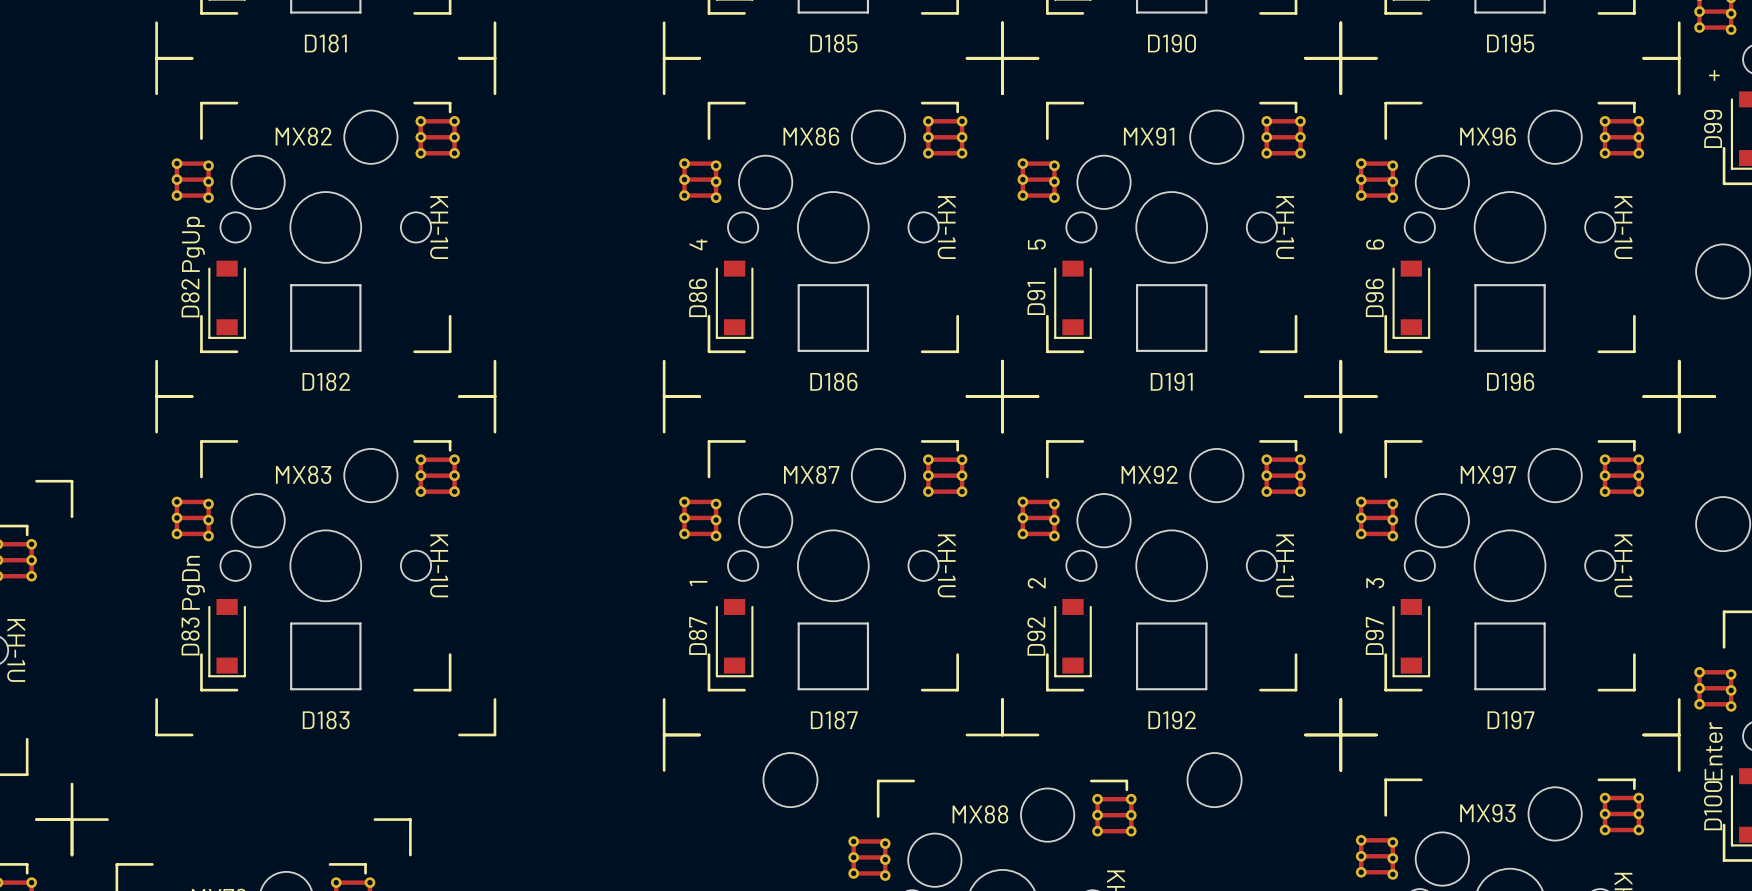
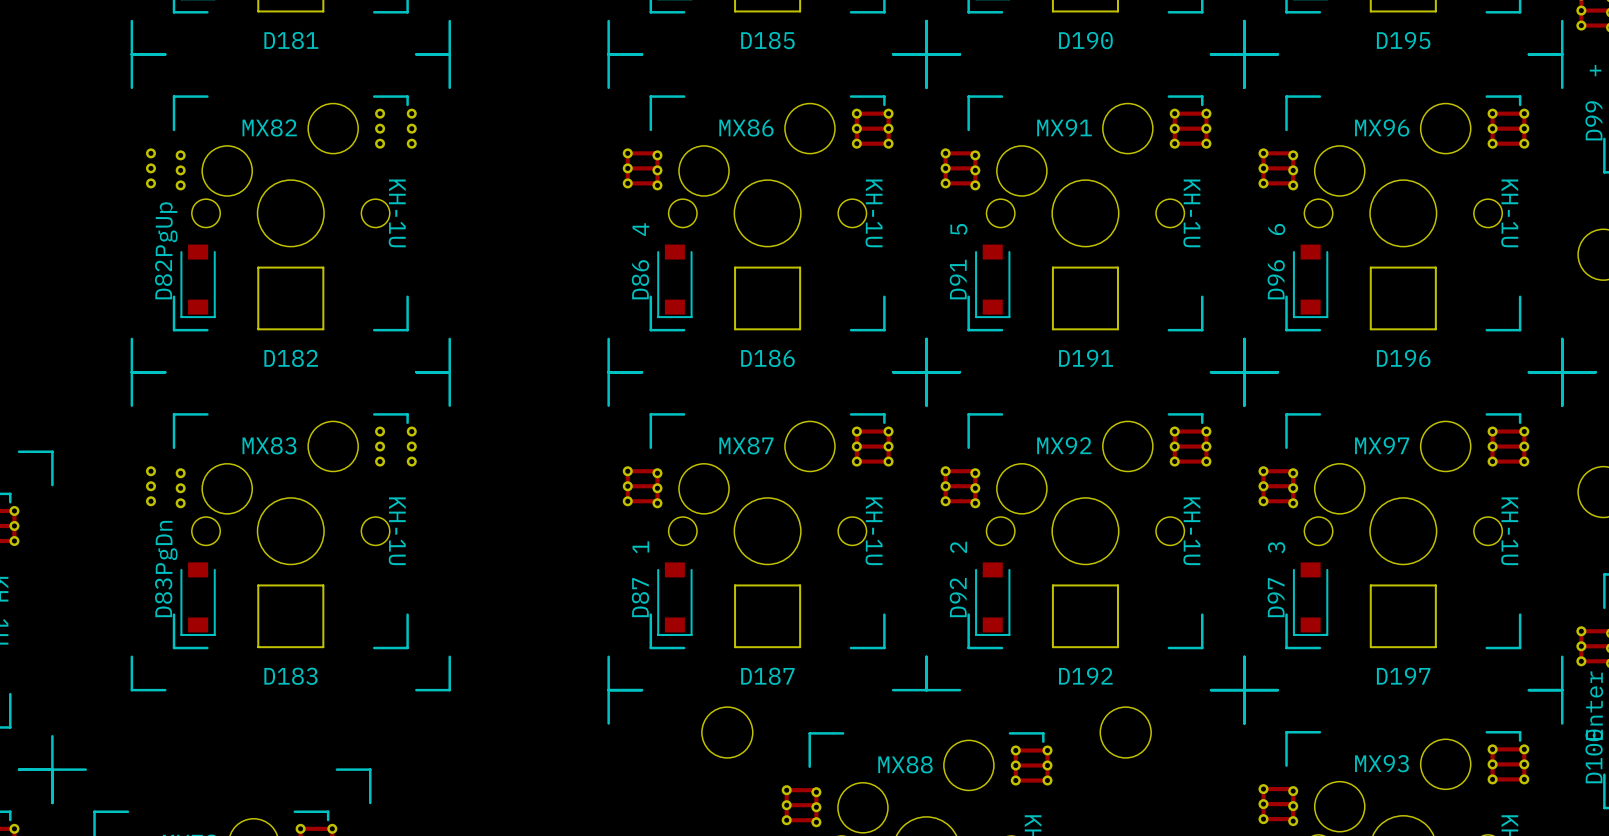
track: (420, 121) (454, 121) (454, 153) (420, 153) (420, 121) -> none
track: (420, 137) (454, 137) -> none
track: (176, 163) (176, 195) (206, 195) (208, 197) (208, 165) (206, 163) (176, 163) -> none
track: (176, 179) (206, 179) (208, 181) -> none
track: (420, 459) (420, 491) (454, 491) (454, 459) (420, 459) -> none
track: (420, 475) (454, 475) -> none
track: (176, 501) (176, 533) (206, 533) (208, 536) (208, 504) (206, 501) (176, 501) -> none
track: (176, 517) (206, 517) (208, 520) -> none

